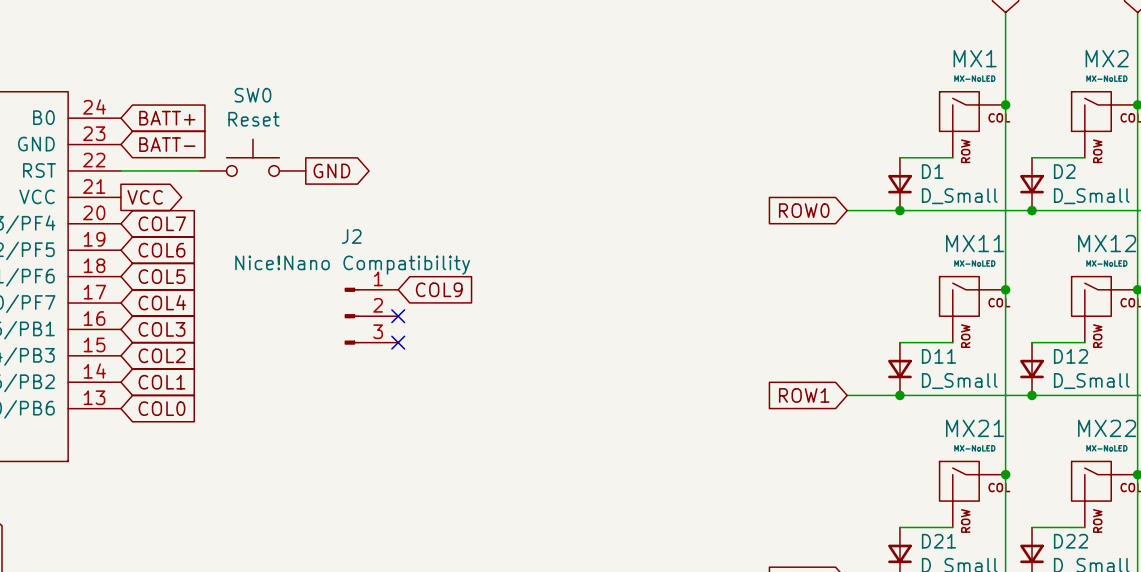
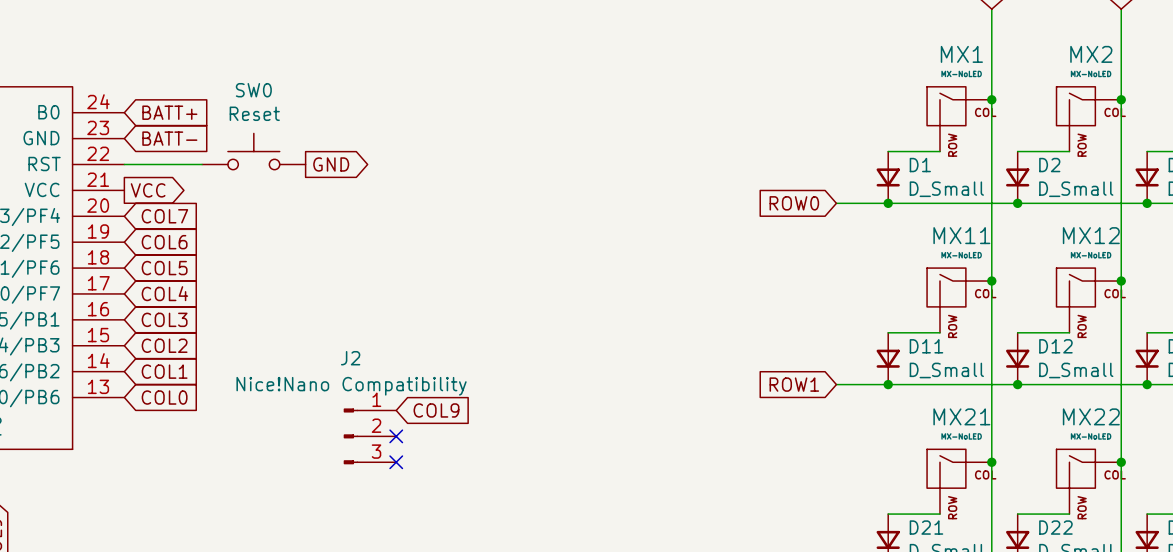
global label position: COL9 (439, 289) -> COL9 (436, 410)
J2 position: (371, 316) -> (369, 436)
no-connect mark: (398, 316) -> none
no-connect mark: (398, 342) -> none
no-connect mark: none -> (396, 436)
no-connect mark: none -> (396, 462)

